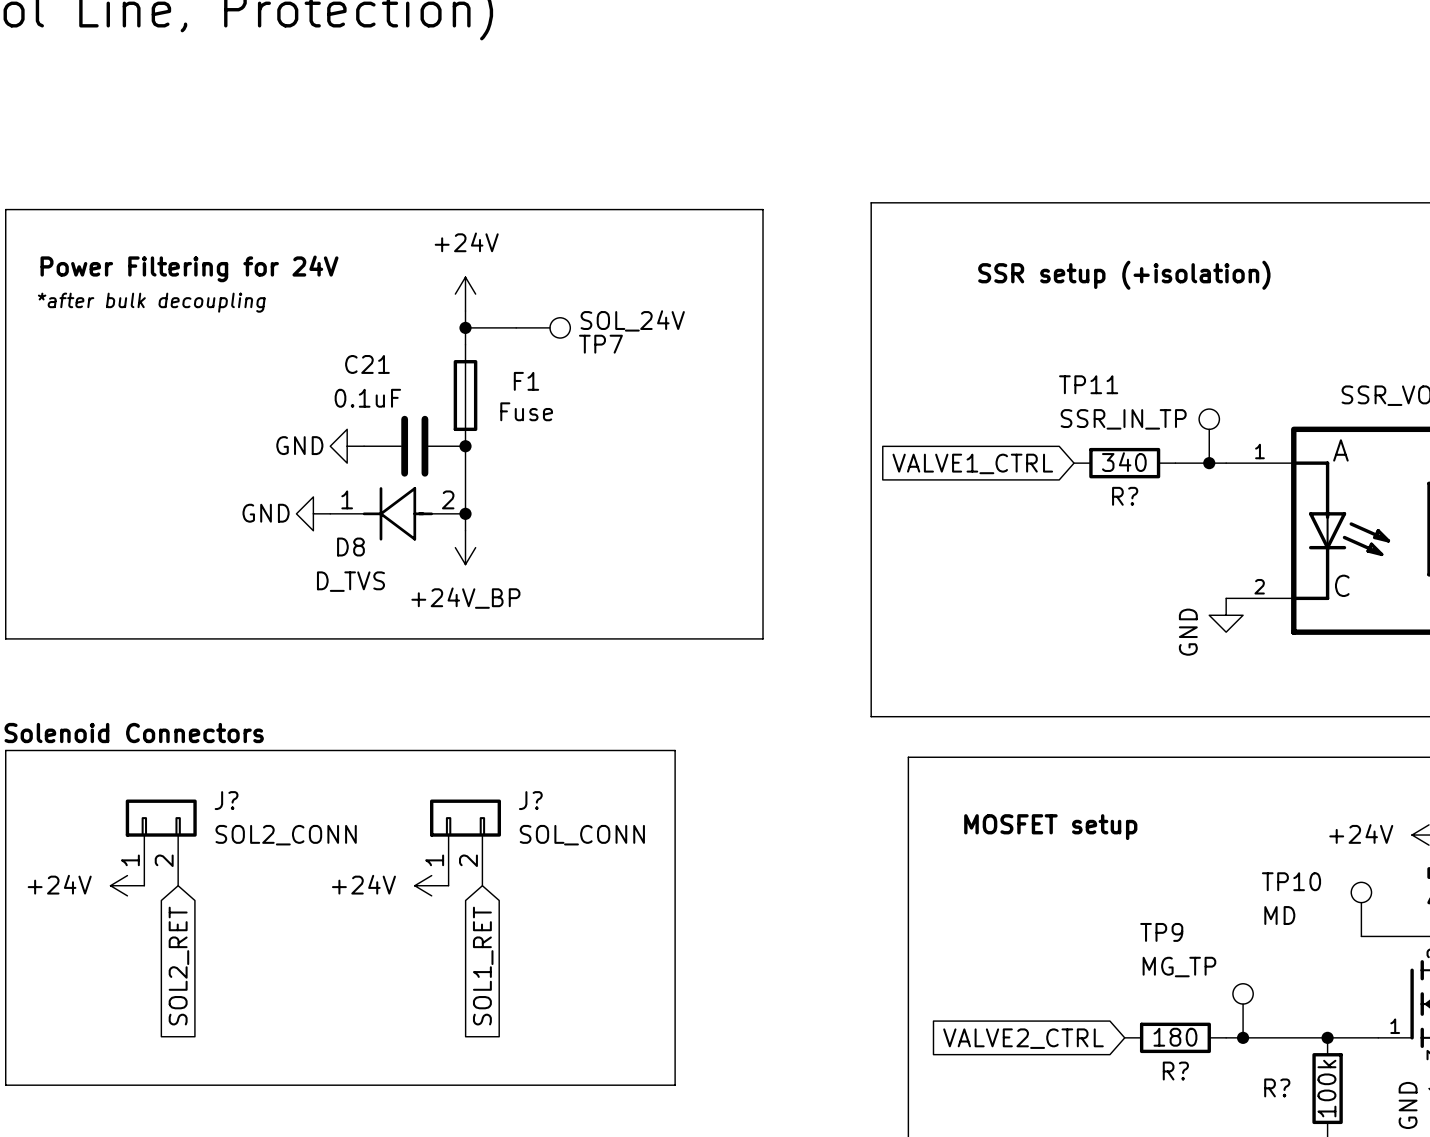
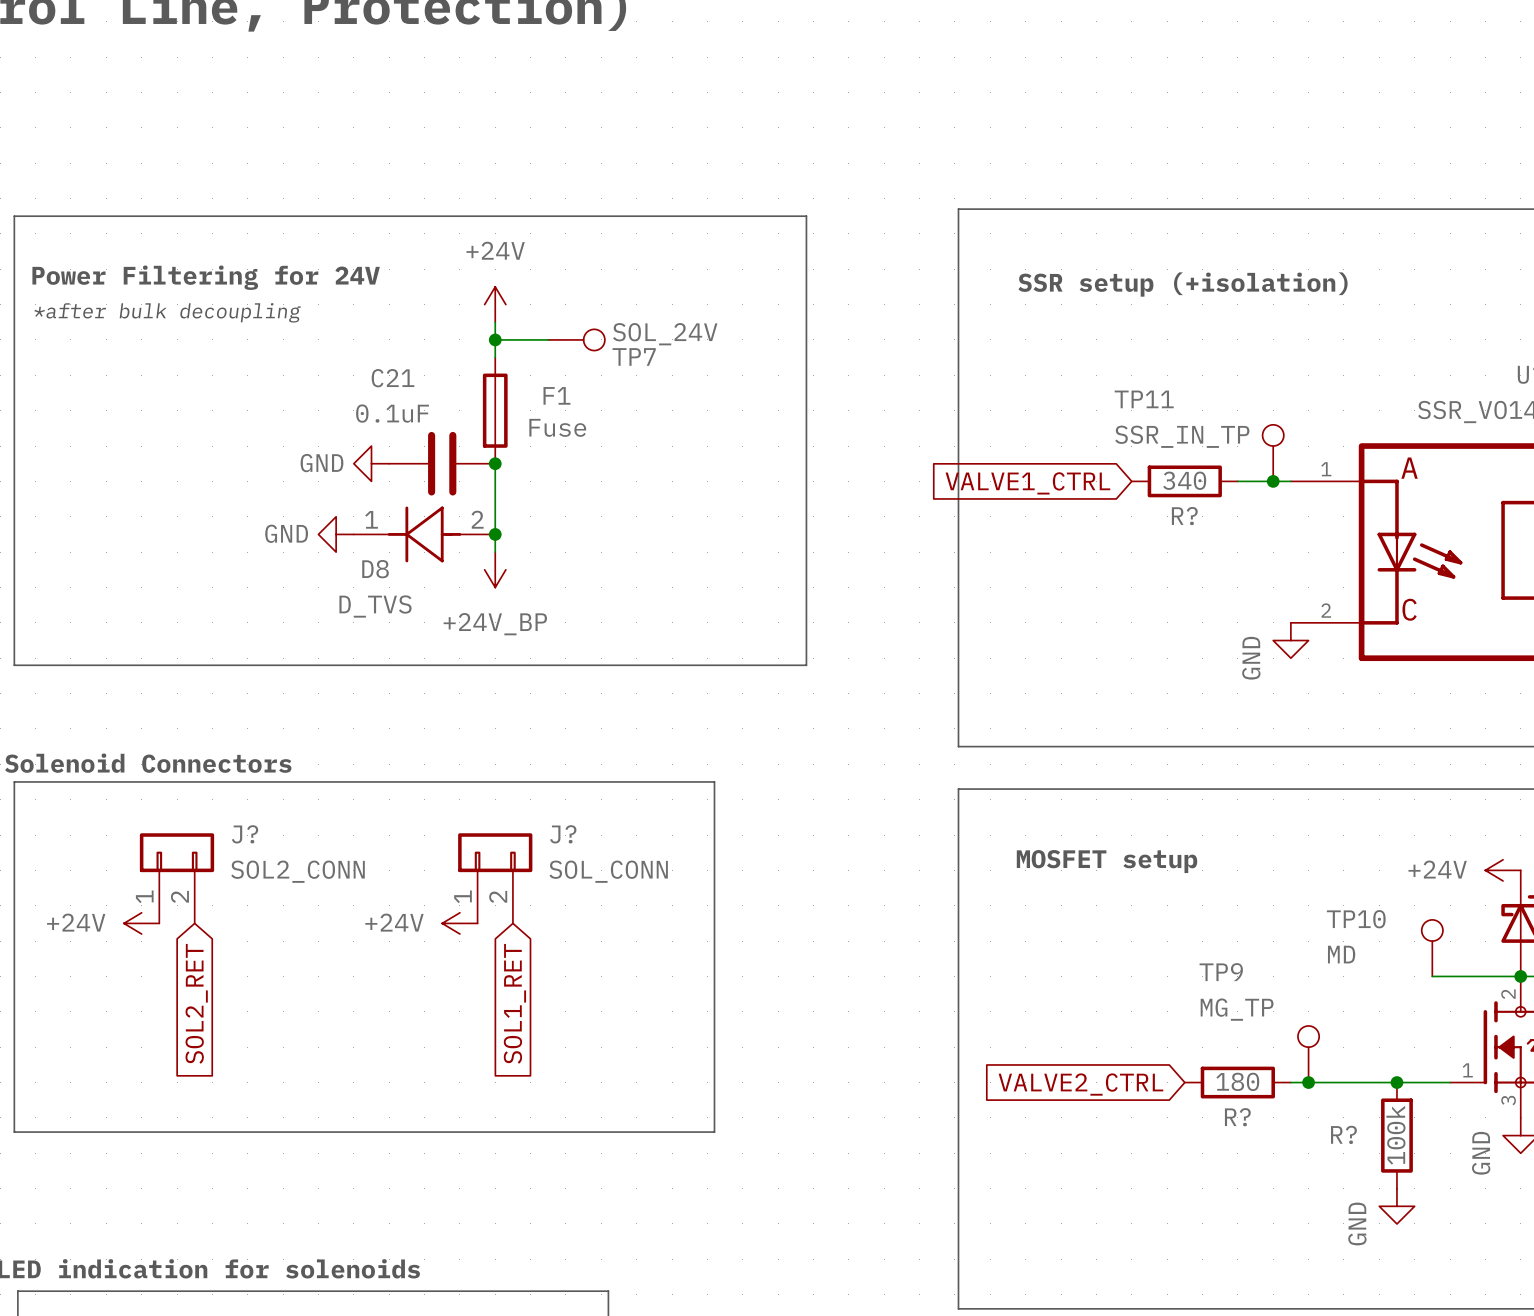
line: (908, 202) (871, 202) (871, 716) (908, 716) -> (958, 209) (958, 746)

